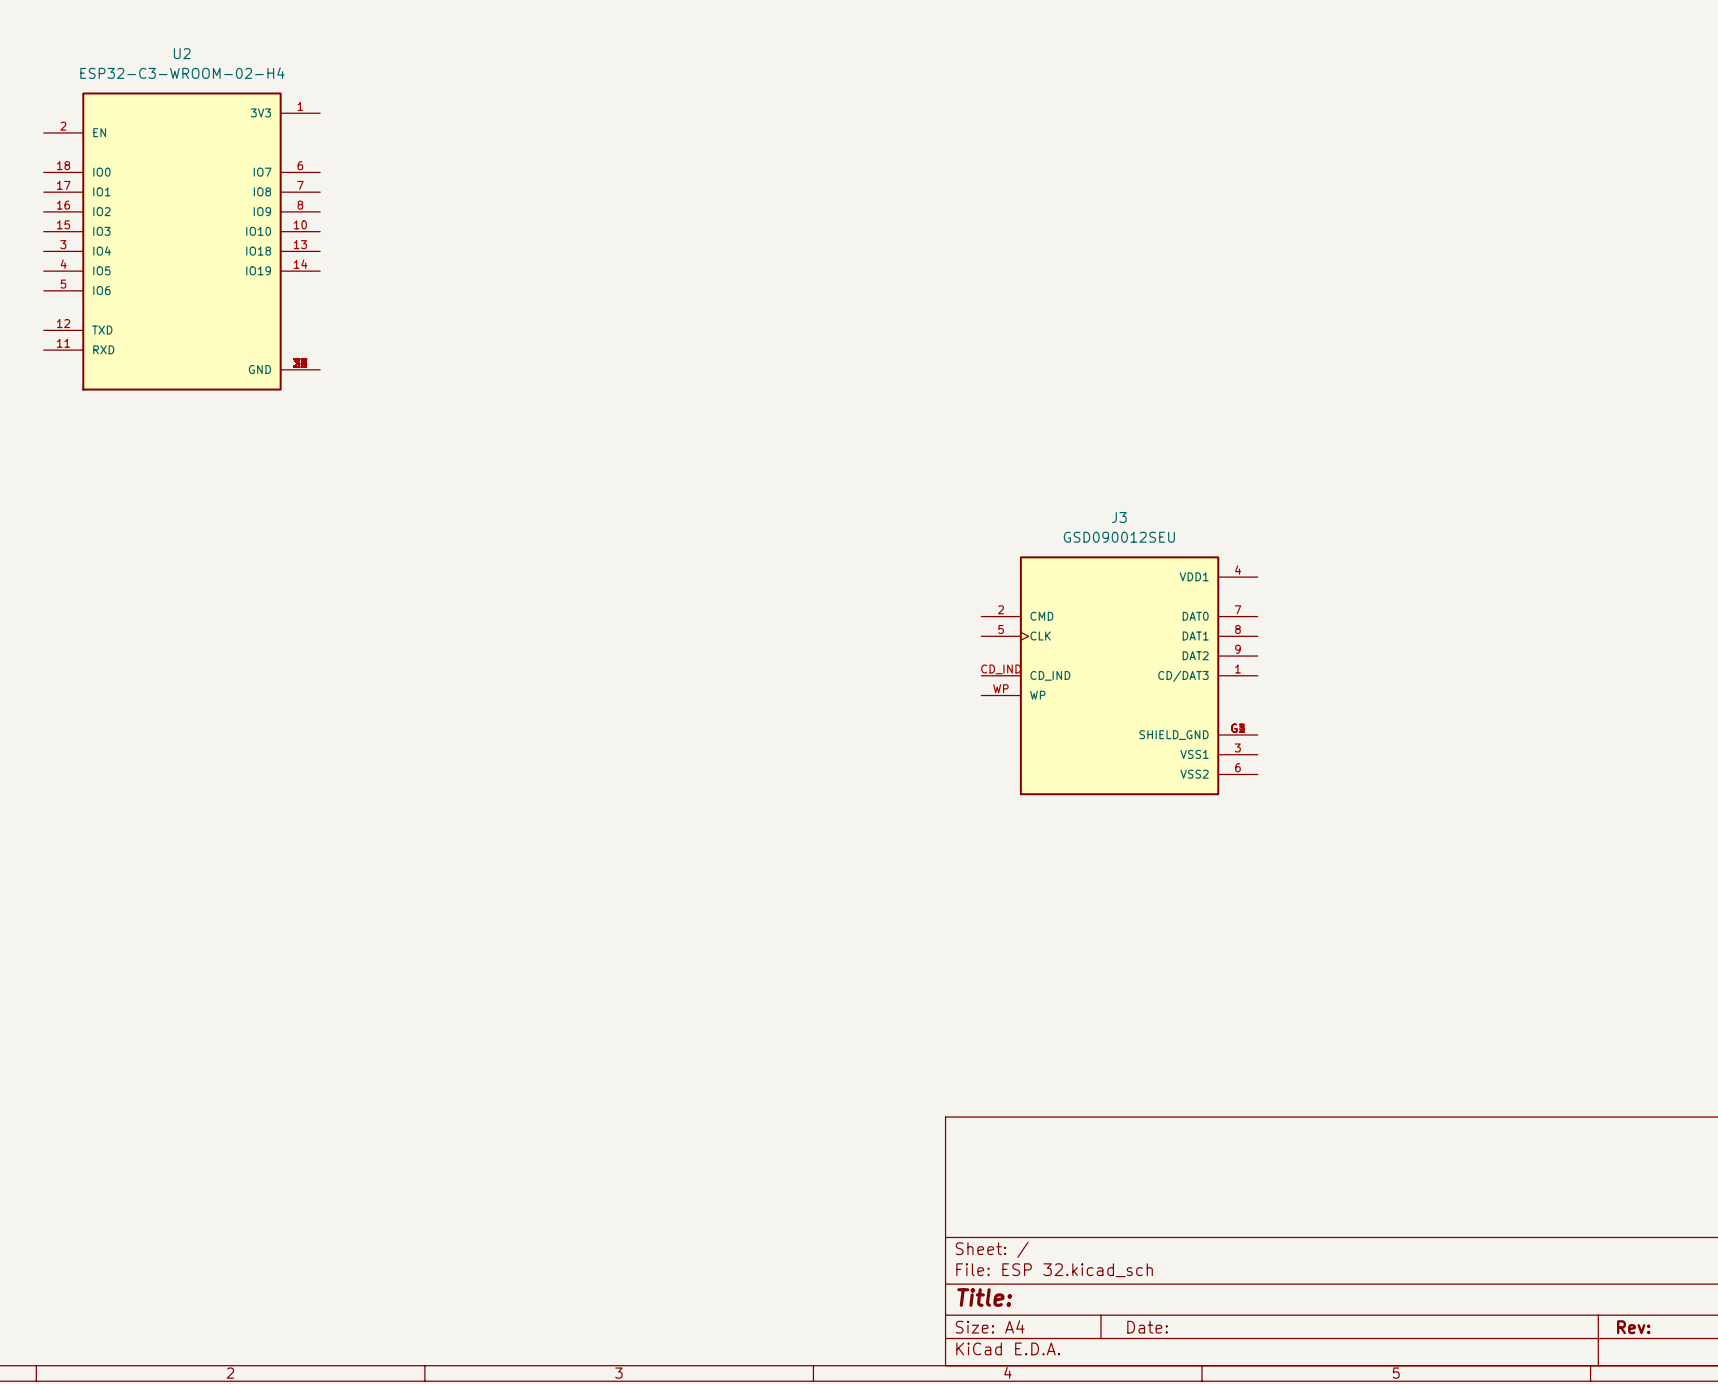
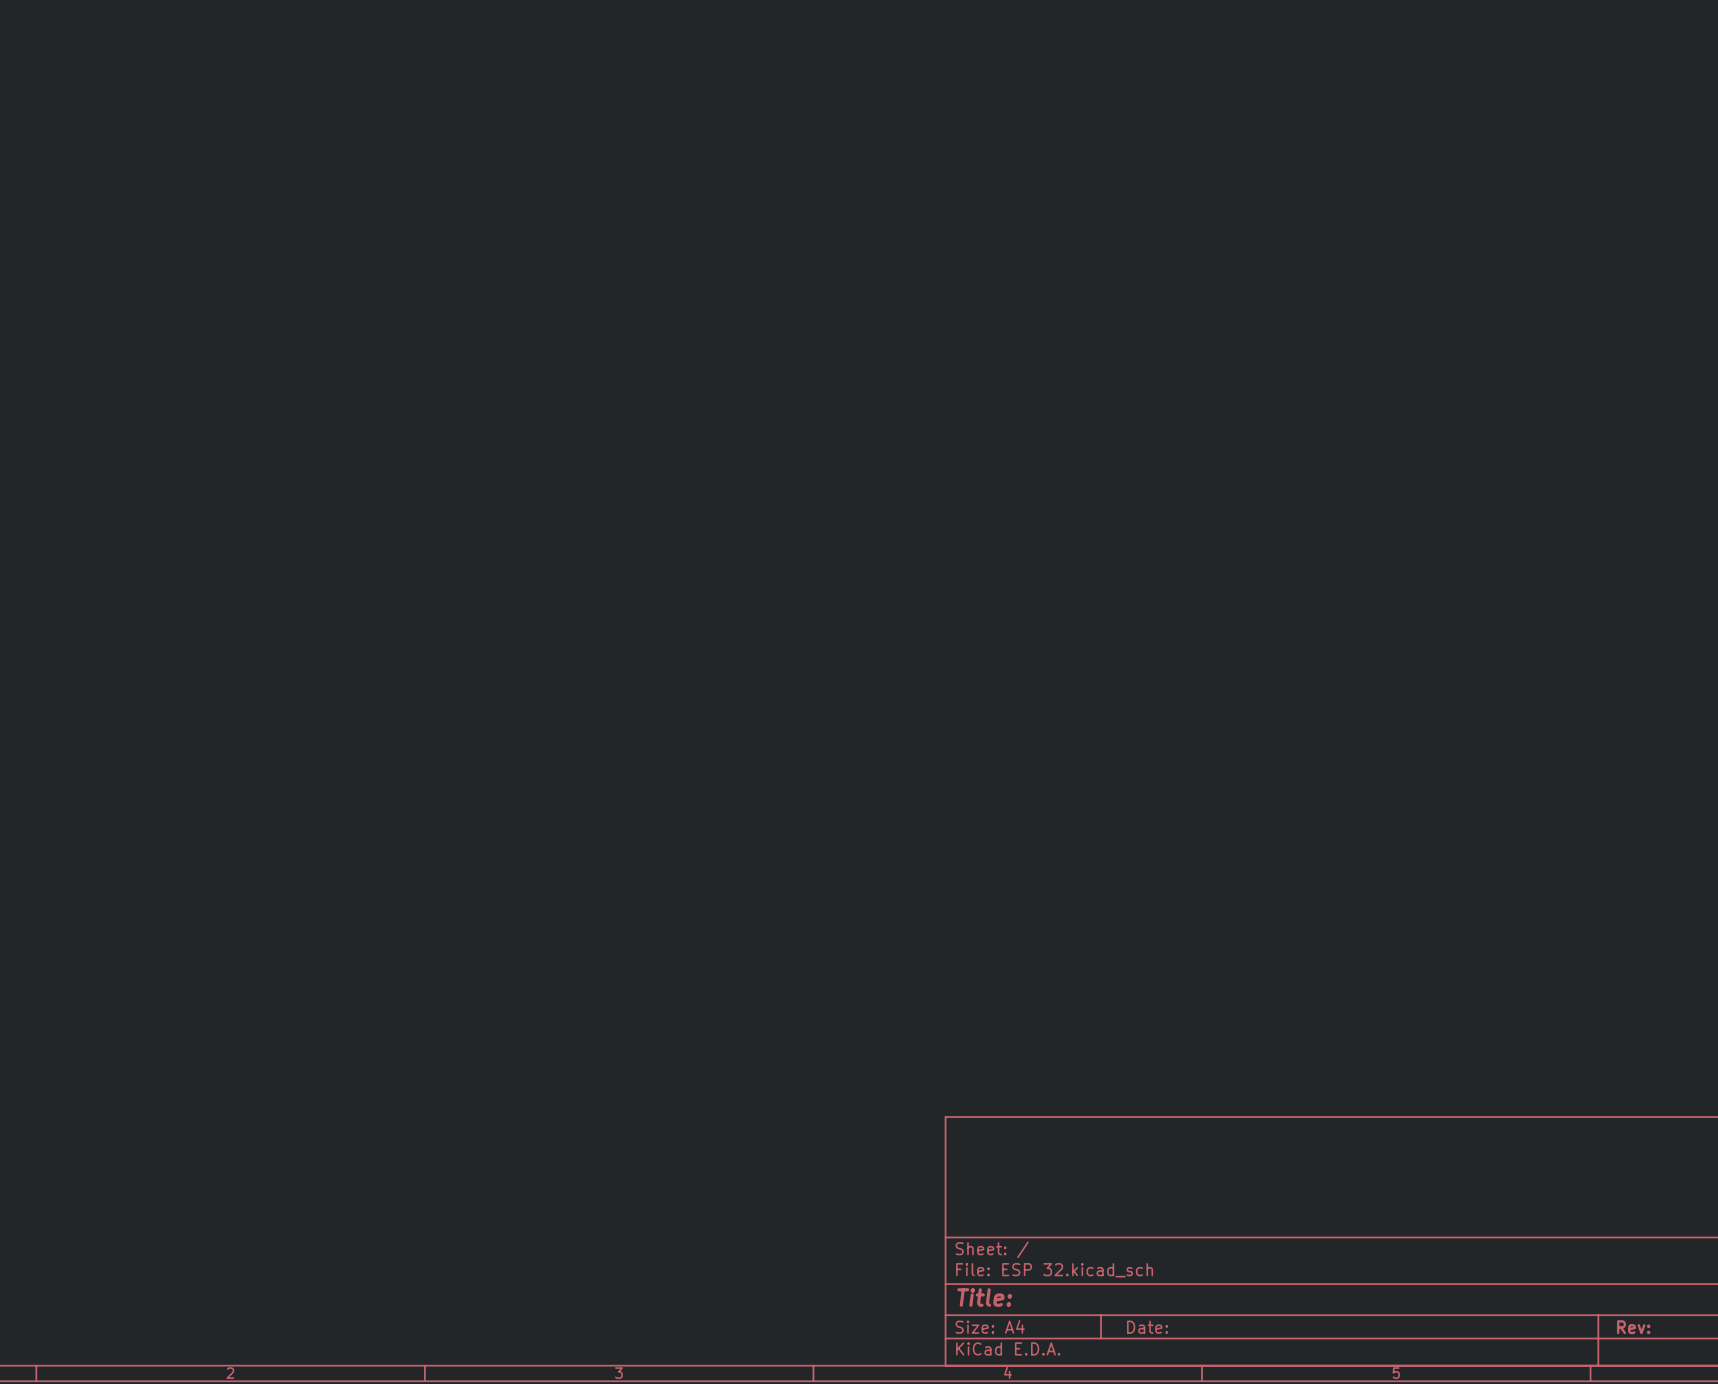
U2: ESP32-C3-WROOM-02-H4 (181, 241) -> none
J3: GSD090012SEU (1119, 675) -> none

